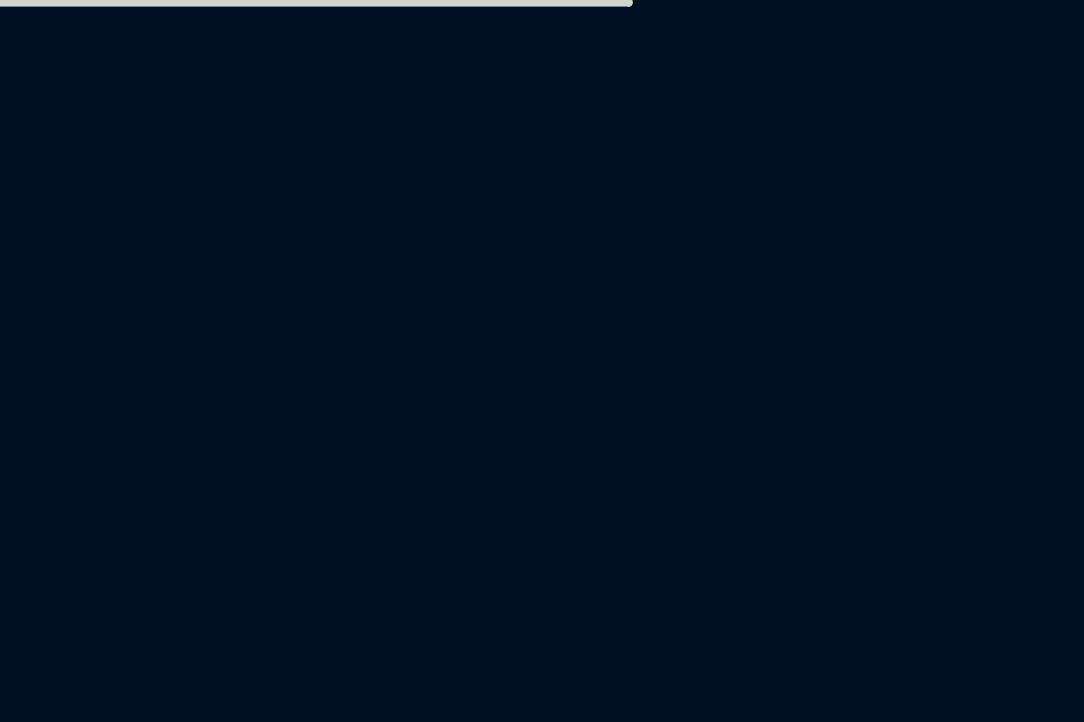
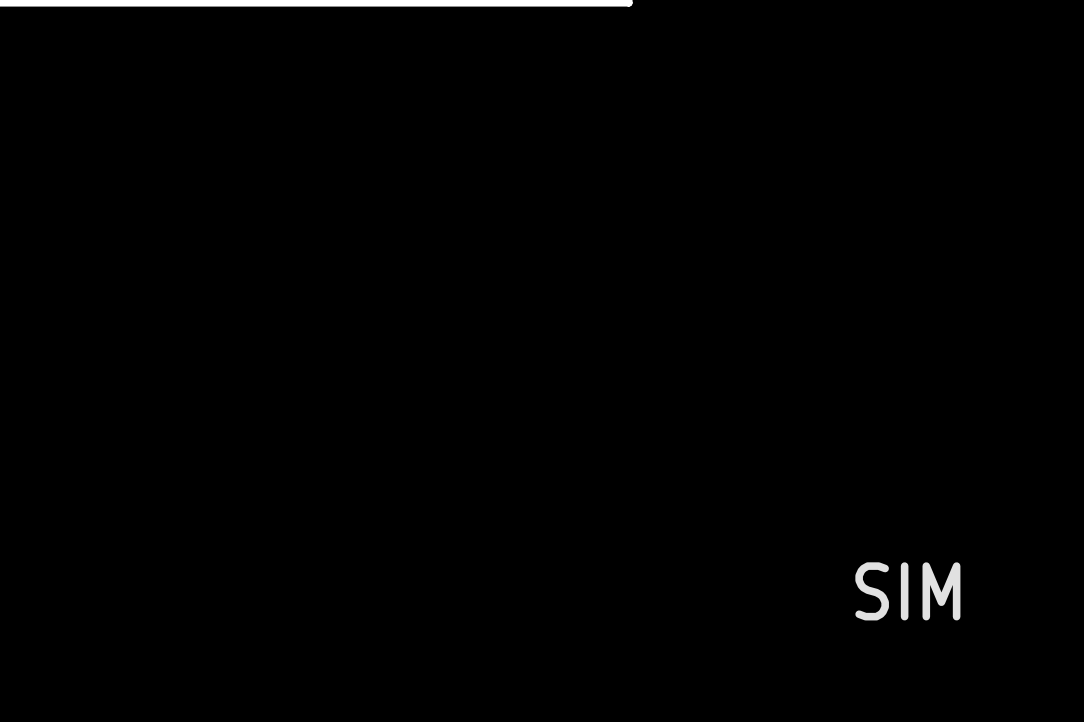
text: none -> SIM (907, 591)

